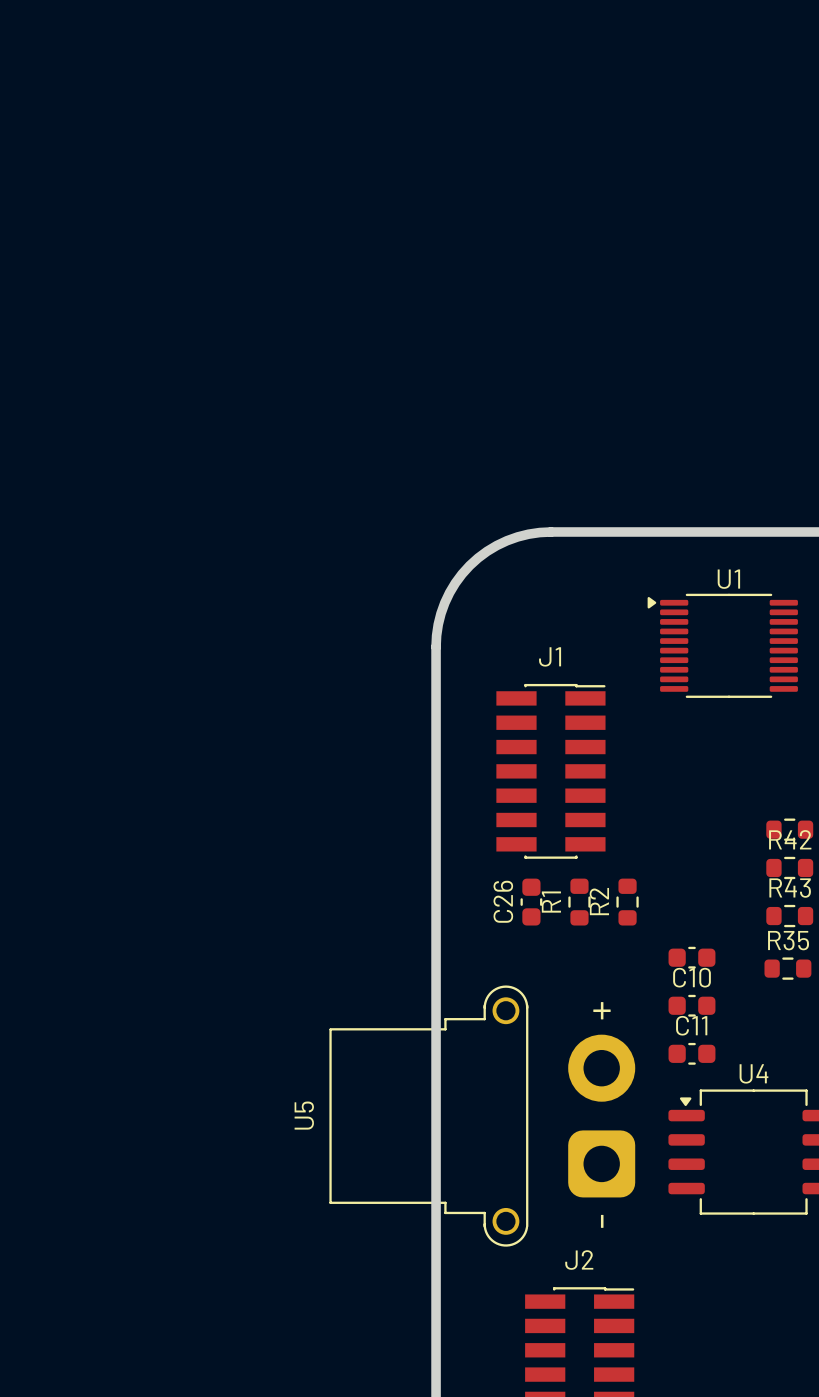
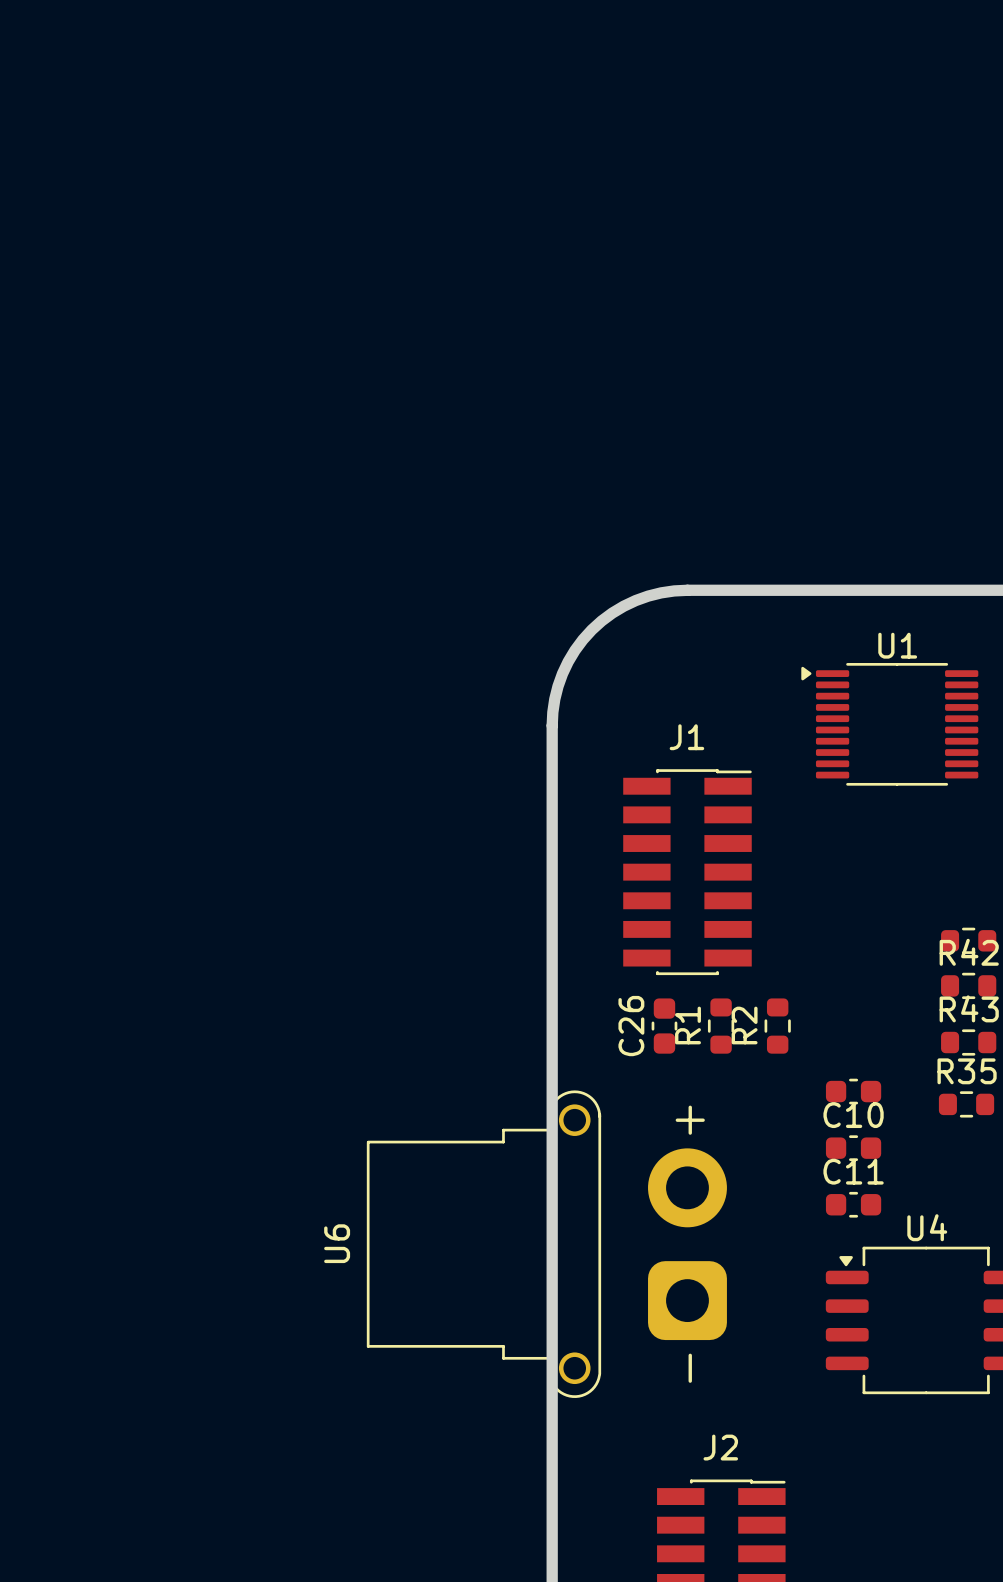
U6: none -> (546, 1244)
U5: (482, 1116) -> none

